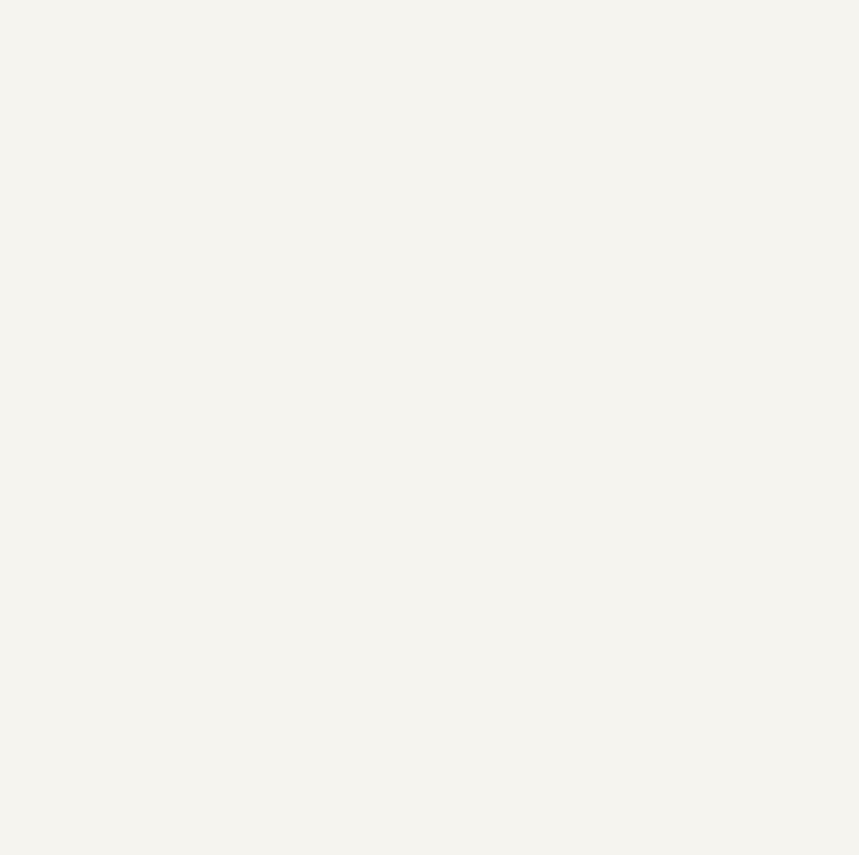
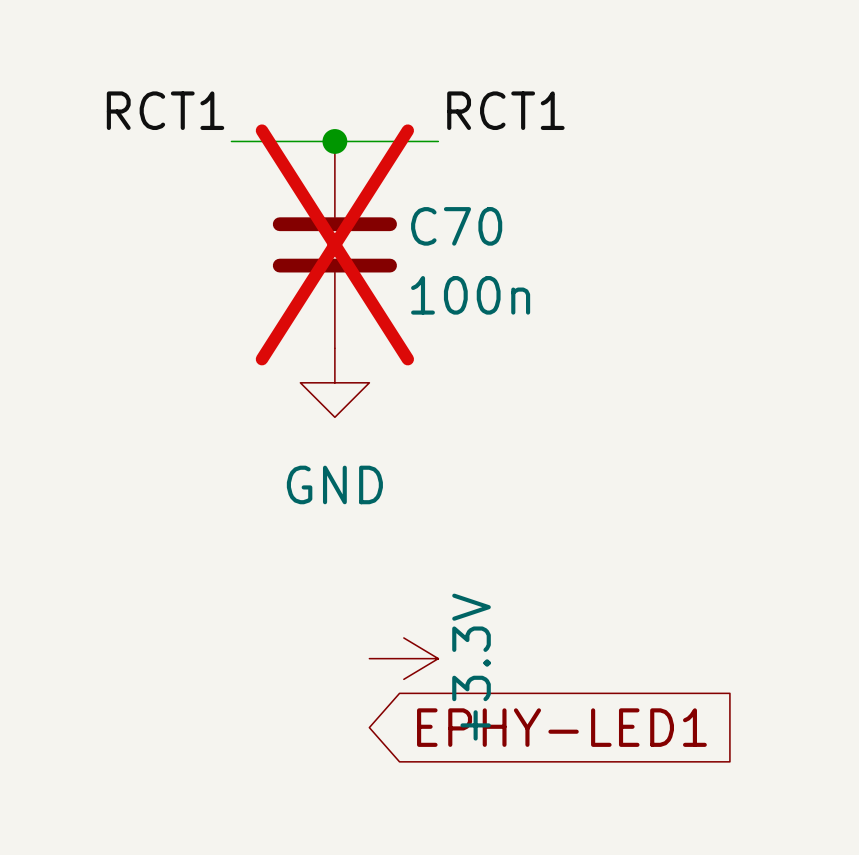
label: none -> RCT1 (165, 110)
label: none -> RCT1 (505, 110)
wire: none -> (231, 141) (438, 141)
junction: none -> (334, 141)
C70: none -> 100n (334, 244)
power symbol: none -> GND (334, 382)
power symbol: none -> +3.3V (403, 658)
global label: none -> EPHY-LED1 (561, 727)

